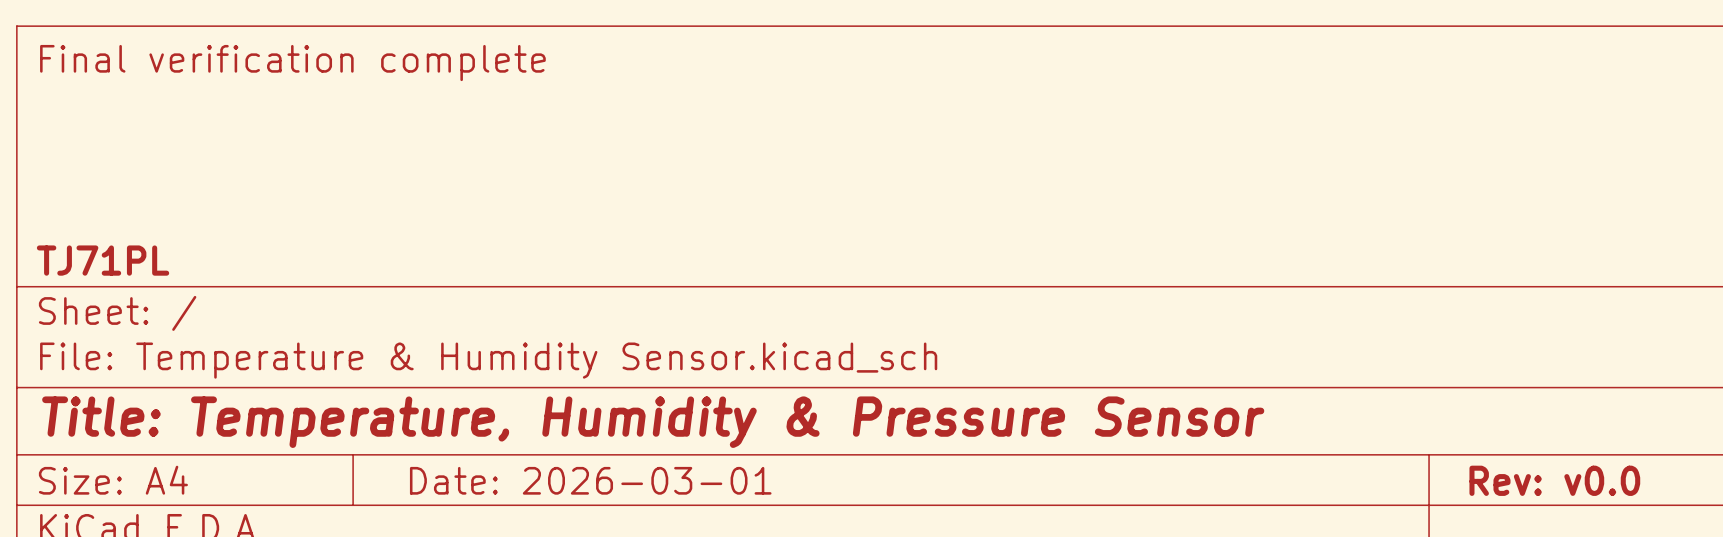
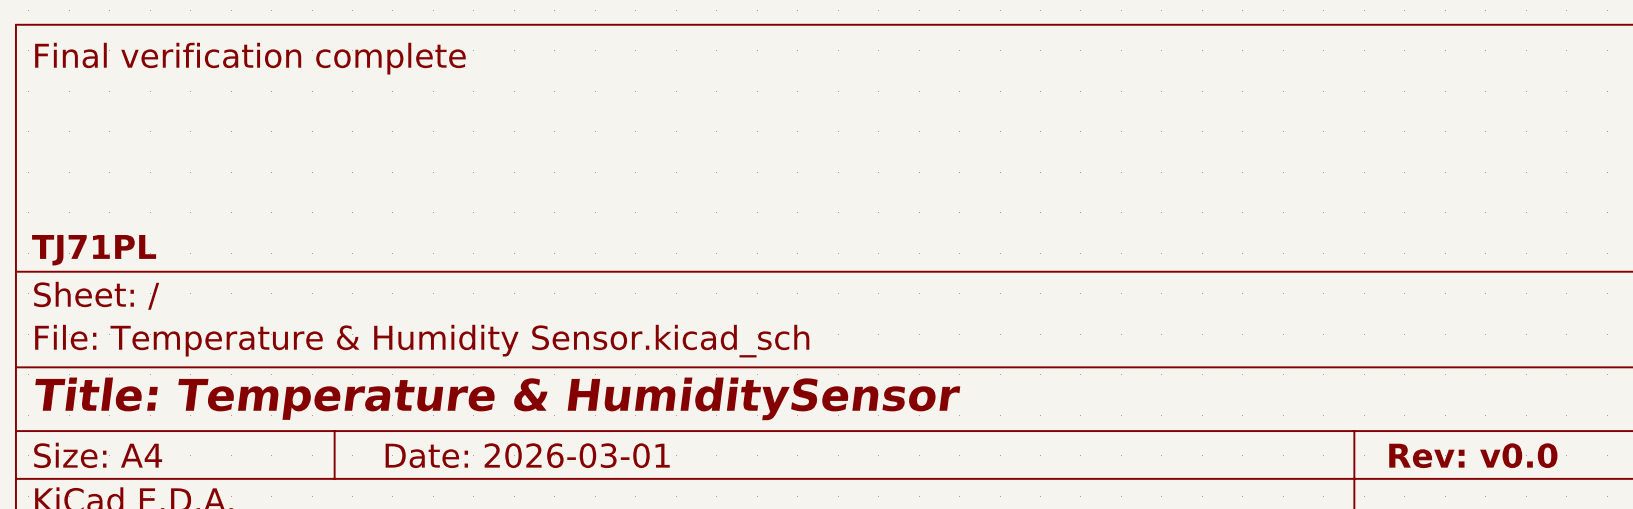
title block: Title: Temperature, Humidity & Pressure Sensor (653, 422) -> Title: Temperature & HumiditySensor (497, 398)

